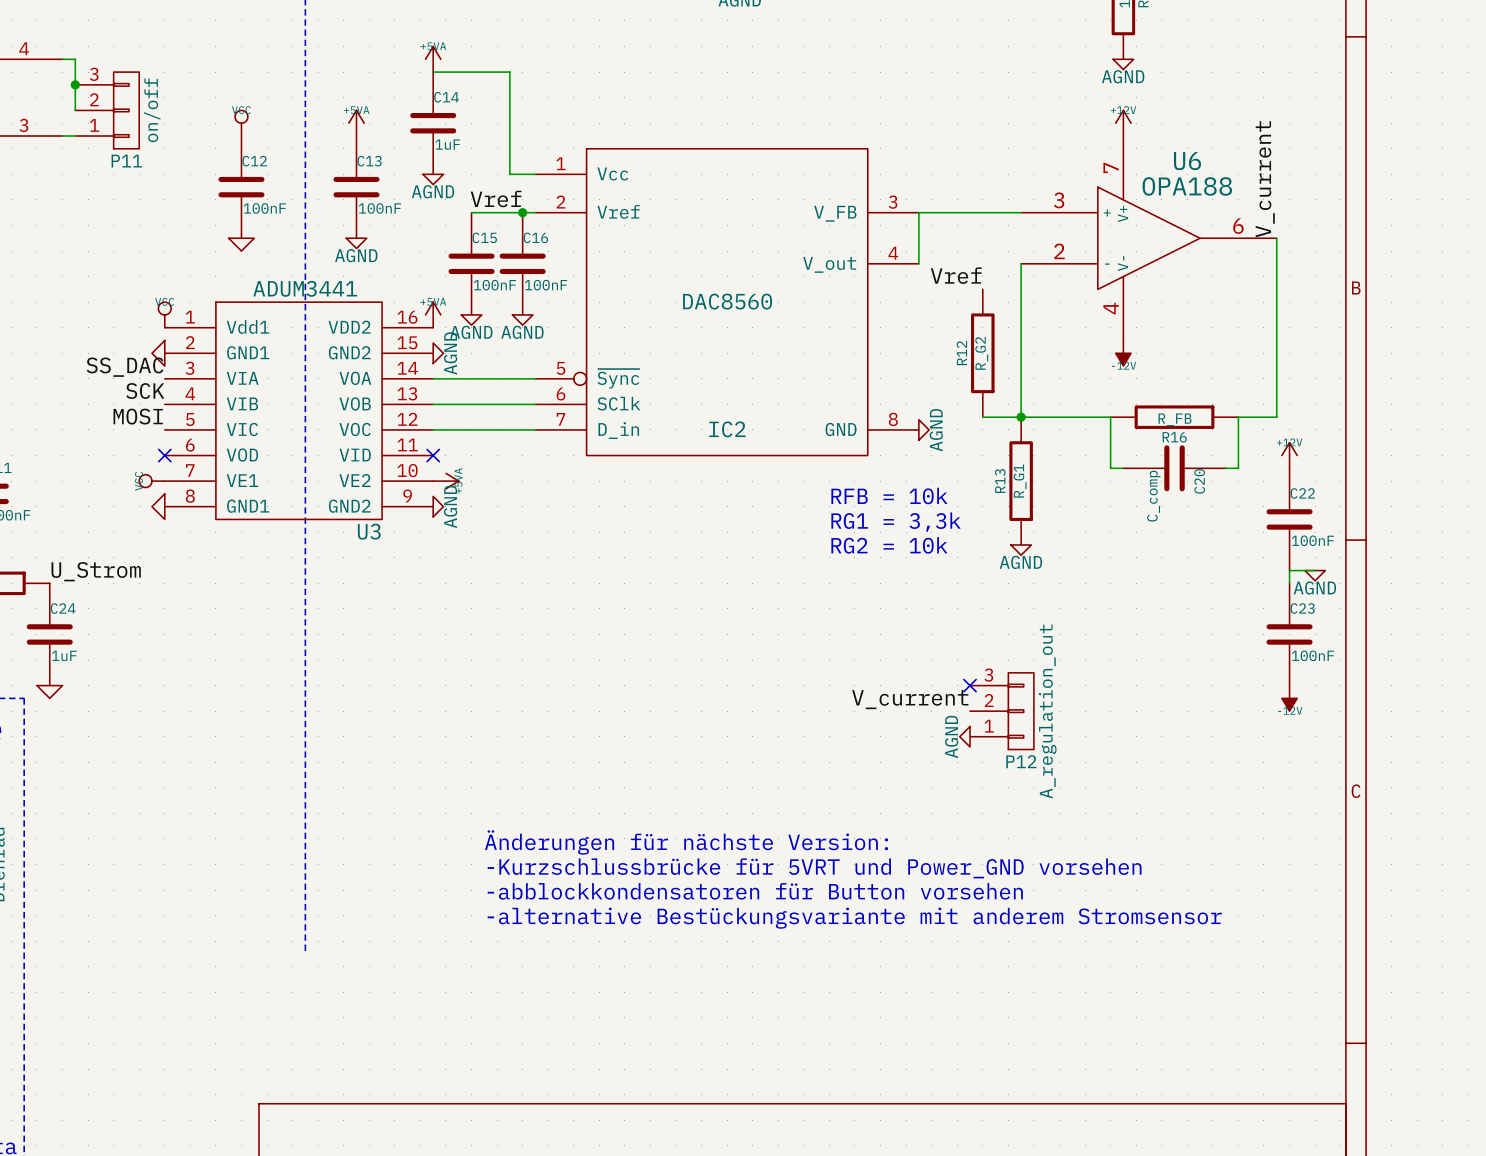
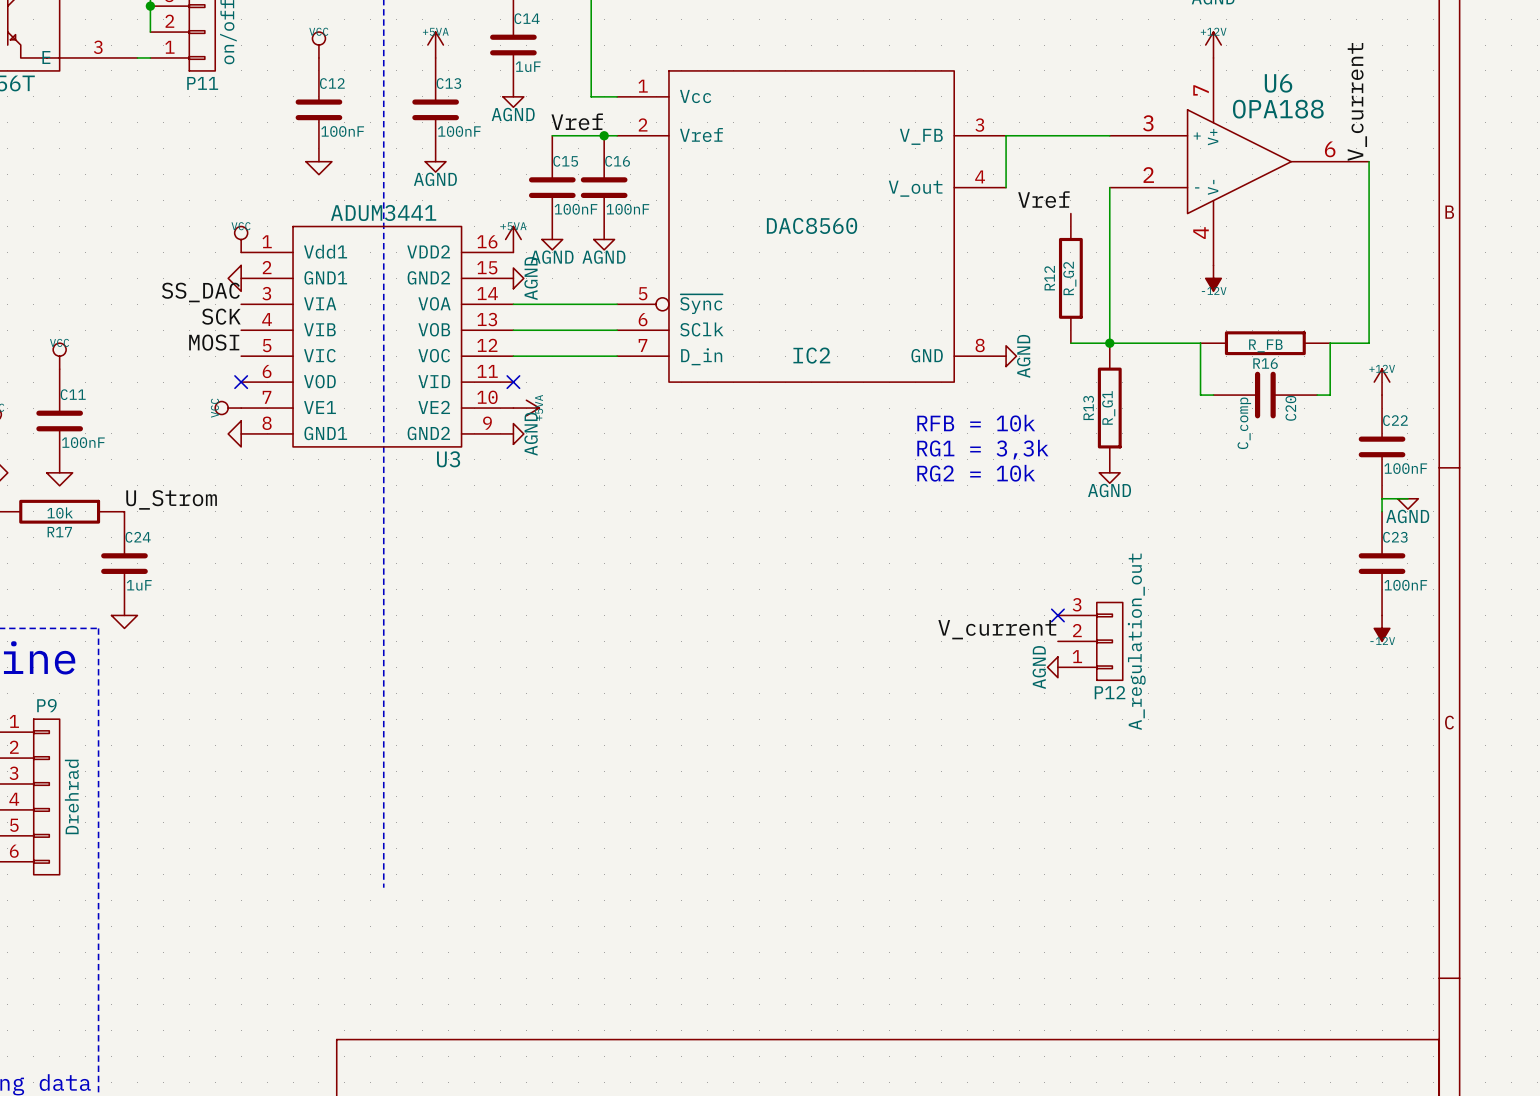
text: Änderungen für nächste Version: (686, 842) -> none
text: -Kurzschlussbrücke für 5VRT und Power_GND vorsehen (814, 868) -> none
text: -abblockkondensatoren für Button vorsehen (755, 891) -> none
text: -alternative Bestückungsvariante mit anderem Stromsensor (854, 918) -> none

